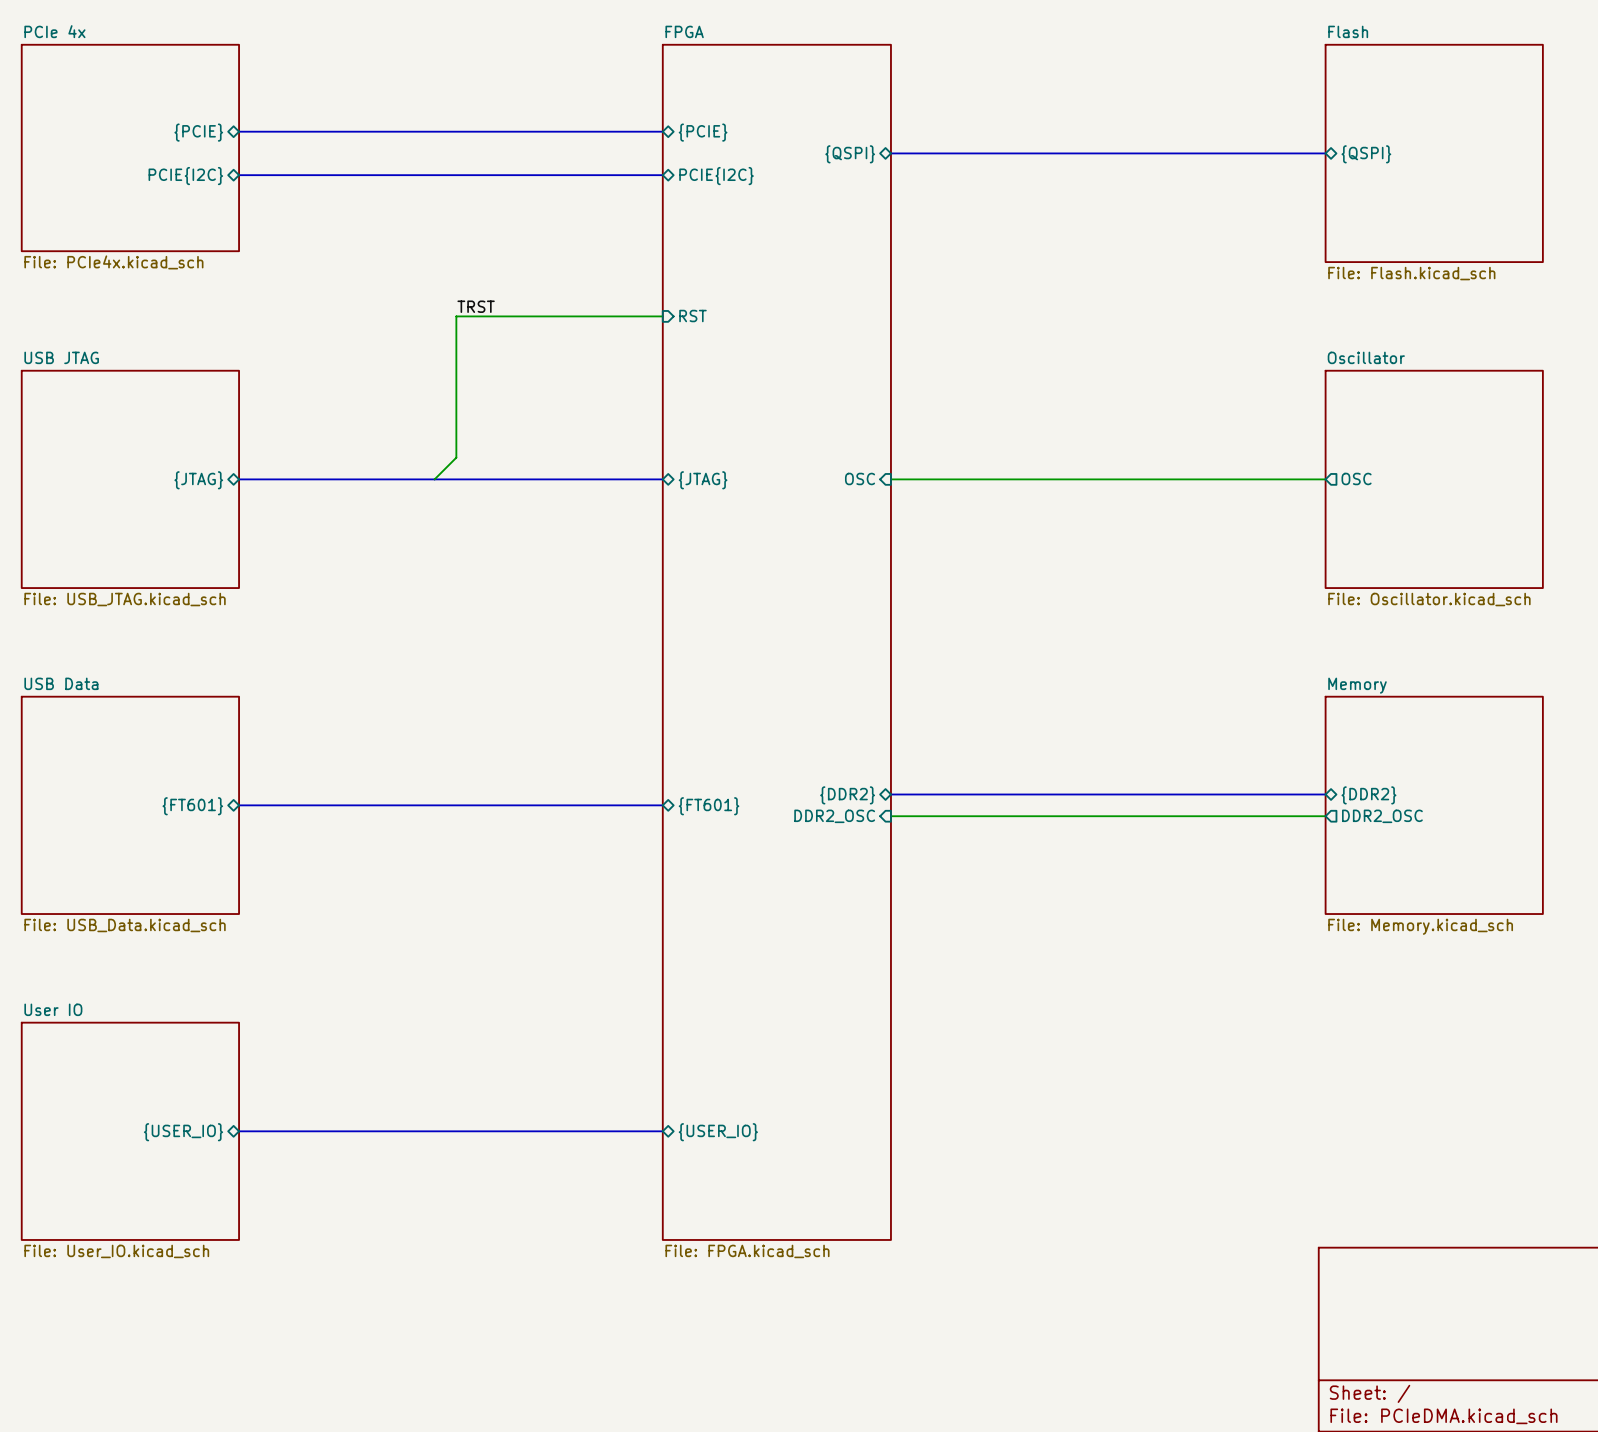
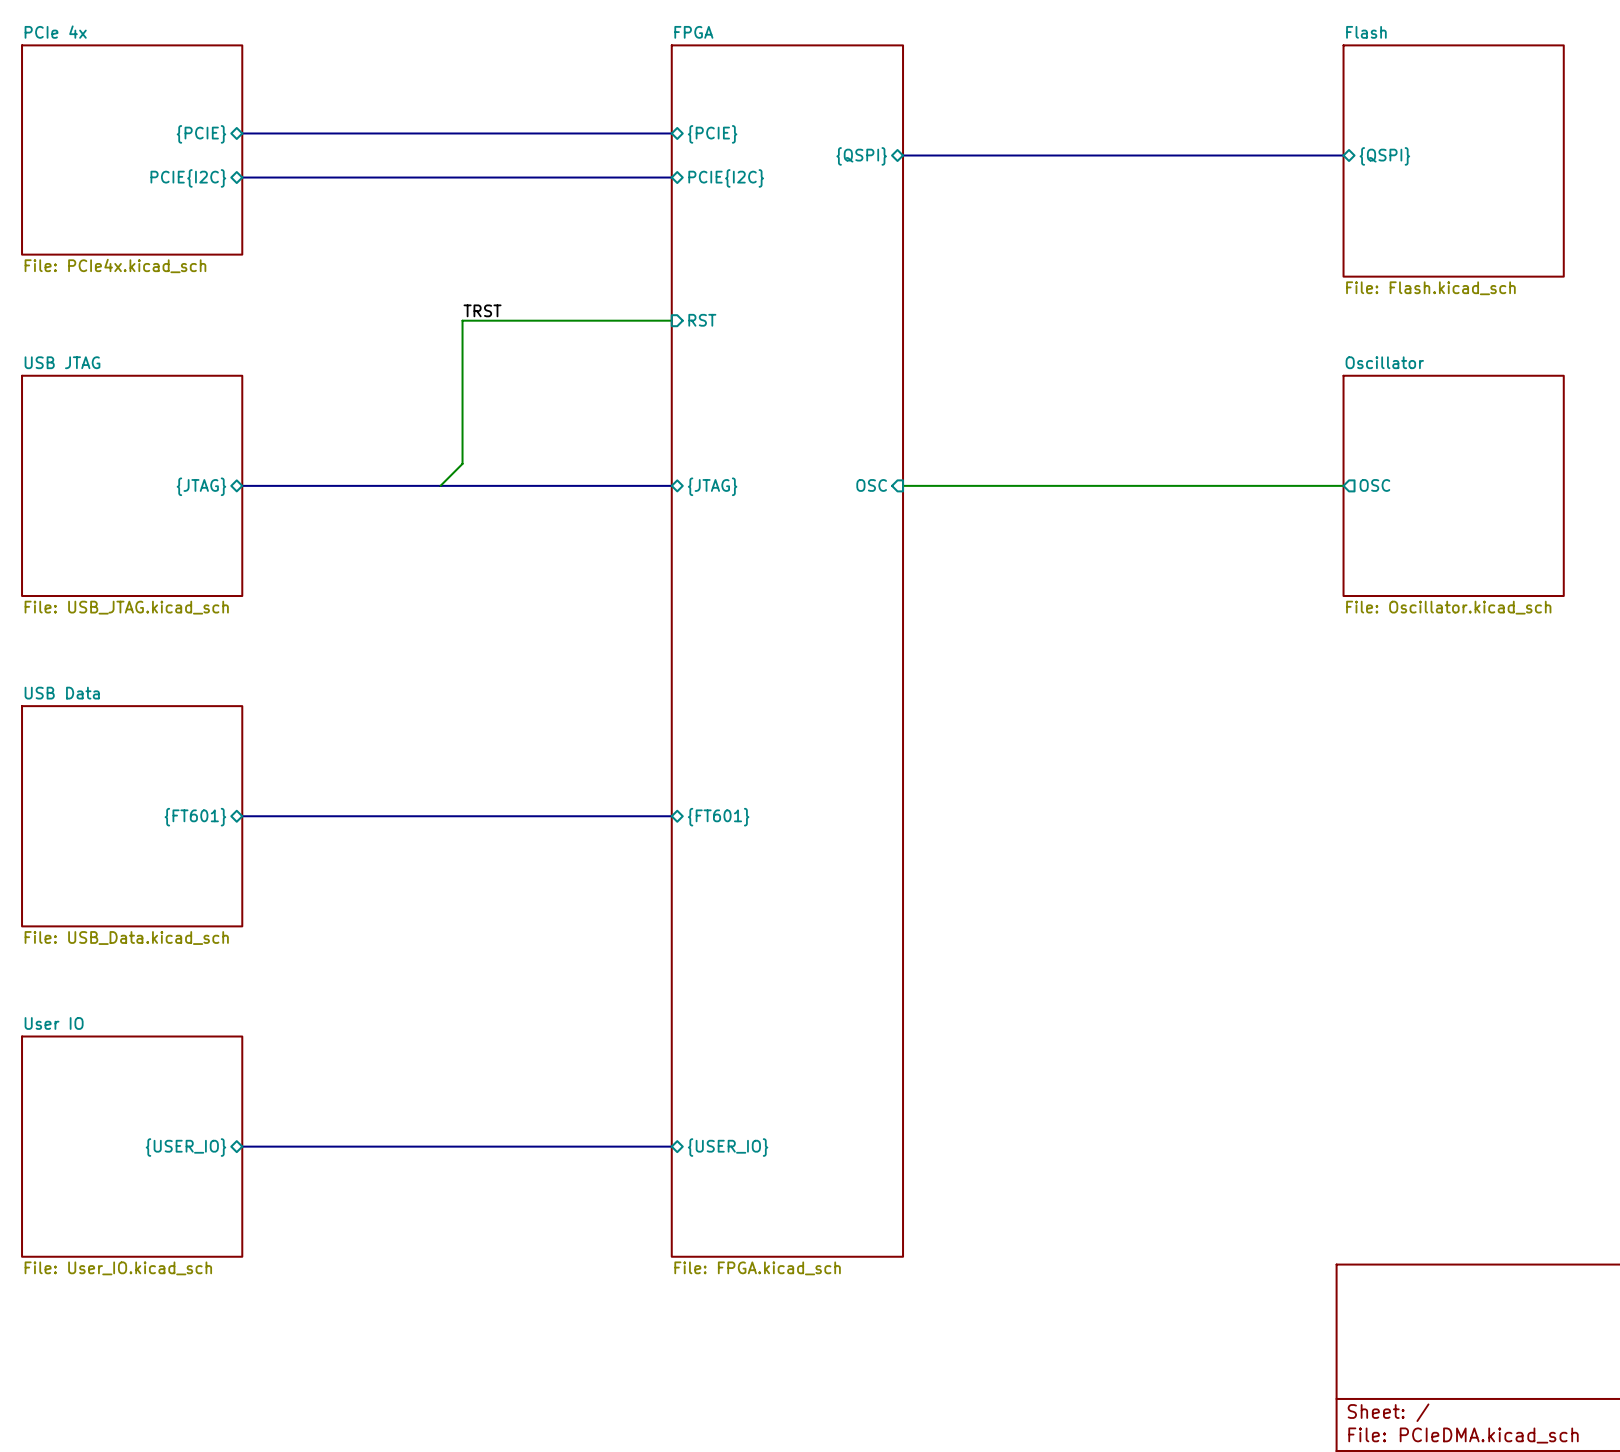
sheet Flash shape: [1324, 44, 1544, 263] -> [1342, 44, 1565, 278]
bus: (890, 794) (1325, 794) -> none
sheet pin: {DDR2} (847, 795) -> none
sheet pin: {DDR2} (1368, 795) -> none
sheet Memory: File: Memory.kicad_sch (1434, 805) -> none
sheet pin: DDR2_OSC (834, 816) -> none
wire: (890, 816) (1325, 816) -> none
sheet pin: DDR2_OSC (1382, 816) -> none

